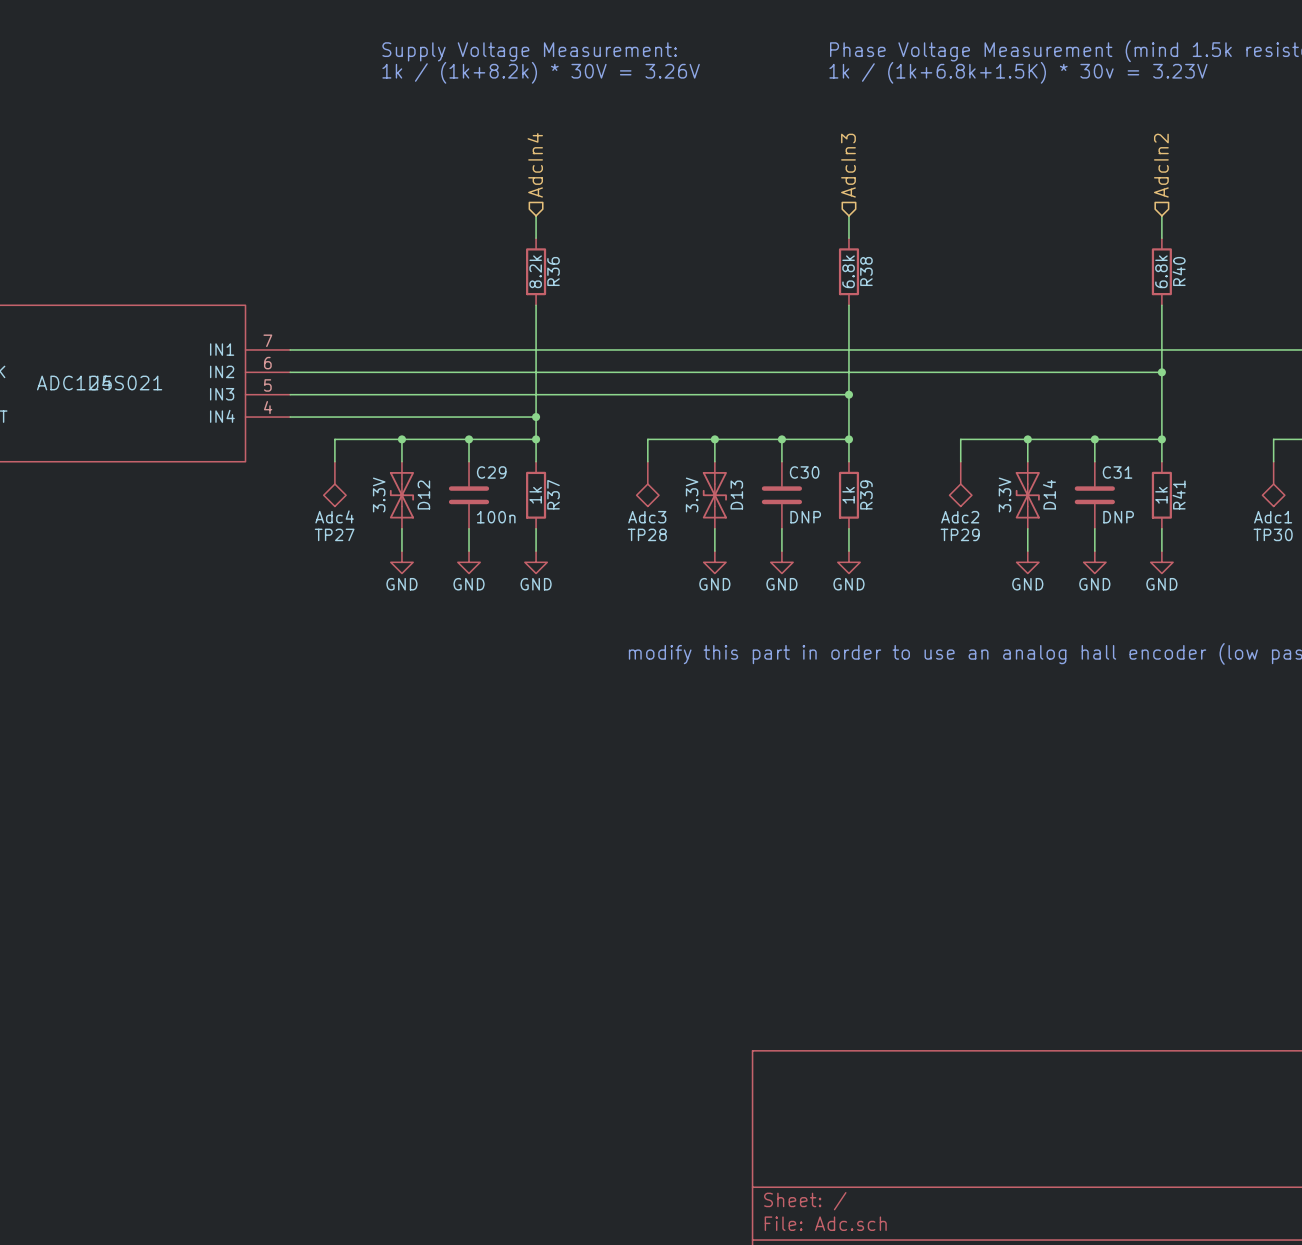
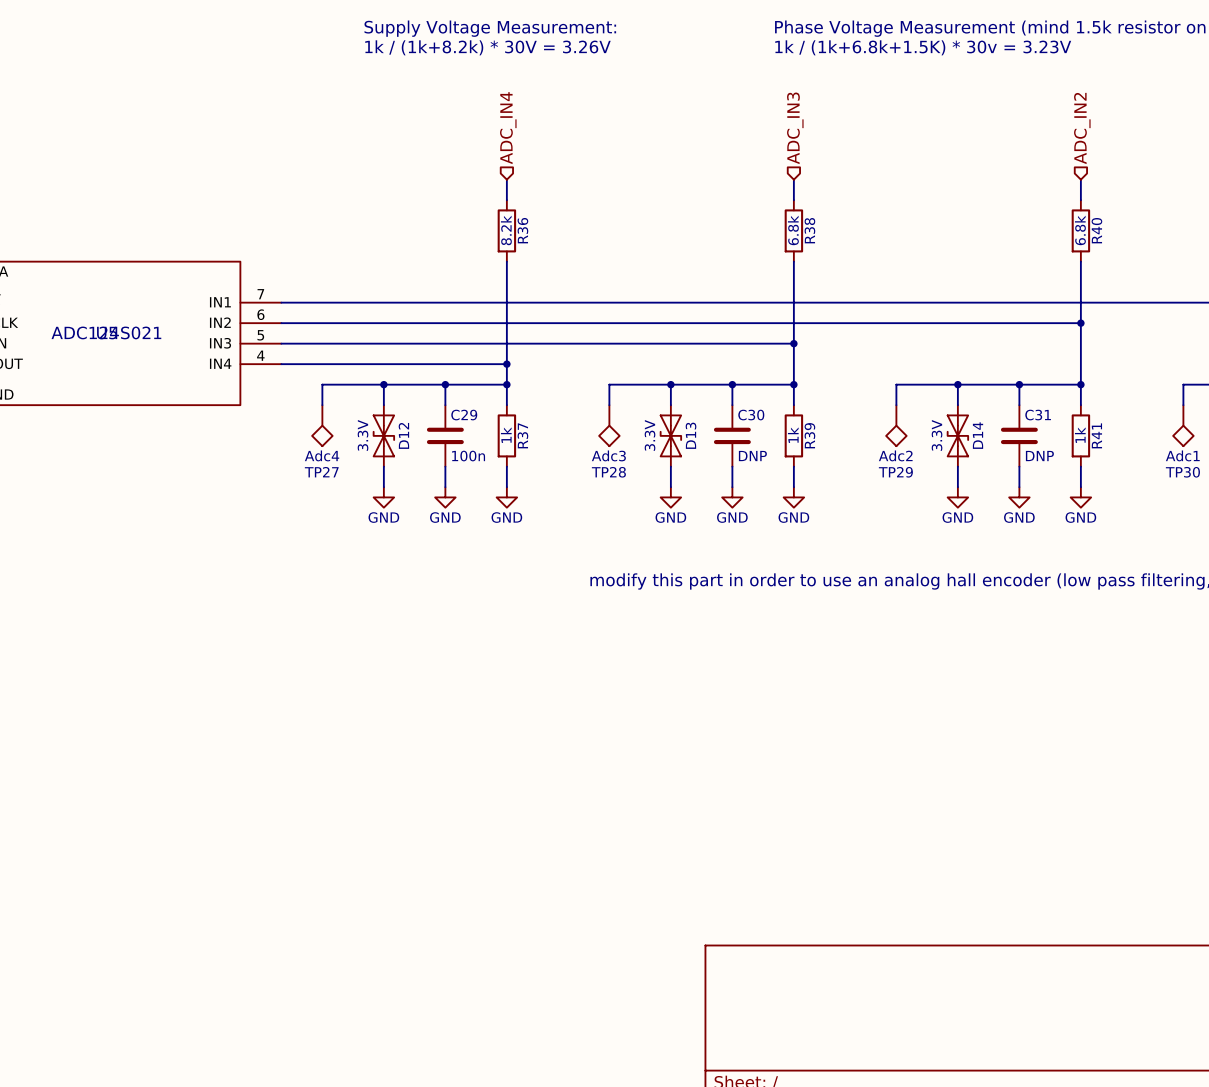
hierarchical label: AdcIn4 (535, 165) -> ADC_IN4 (508, 128)
hierarchical label: AdcIn3 (848, 165) -> ADC_IN3 (795, 128)
hierarchical label: AdcIn2 (1161, 165) -> ADC_IN2 (1082, 128)

